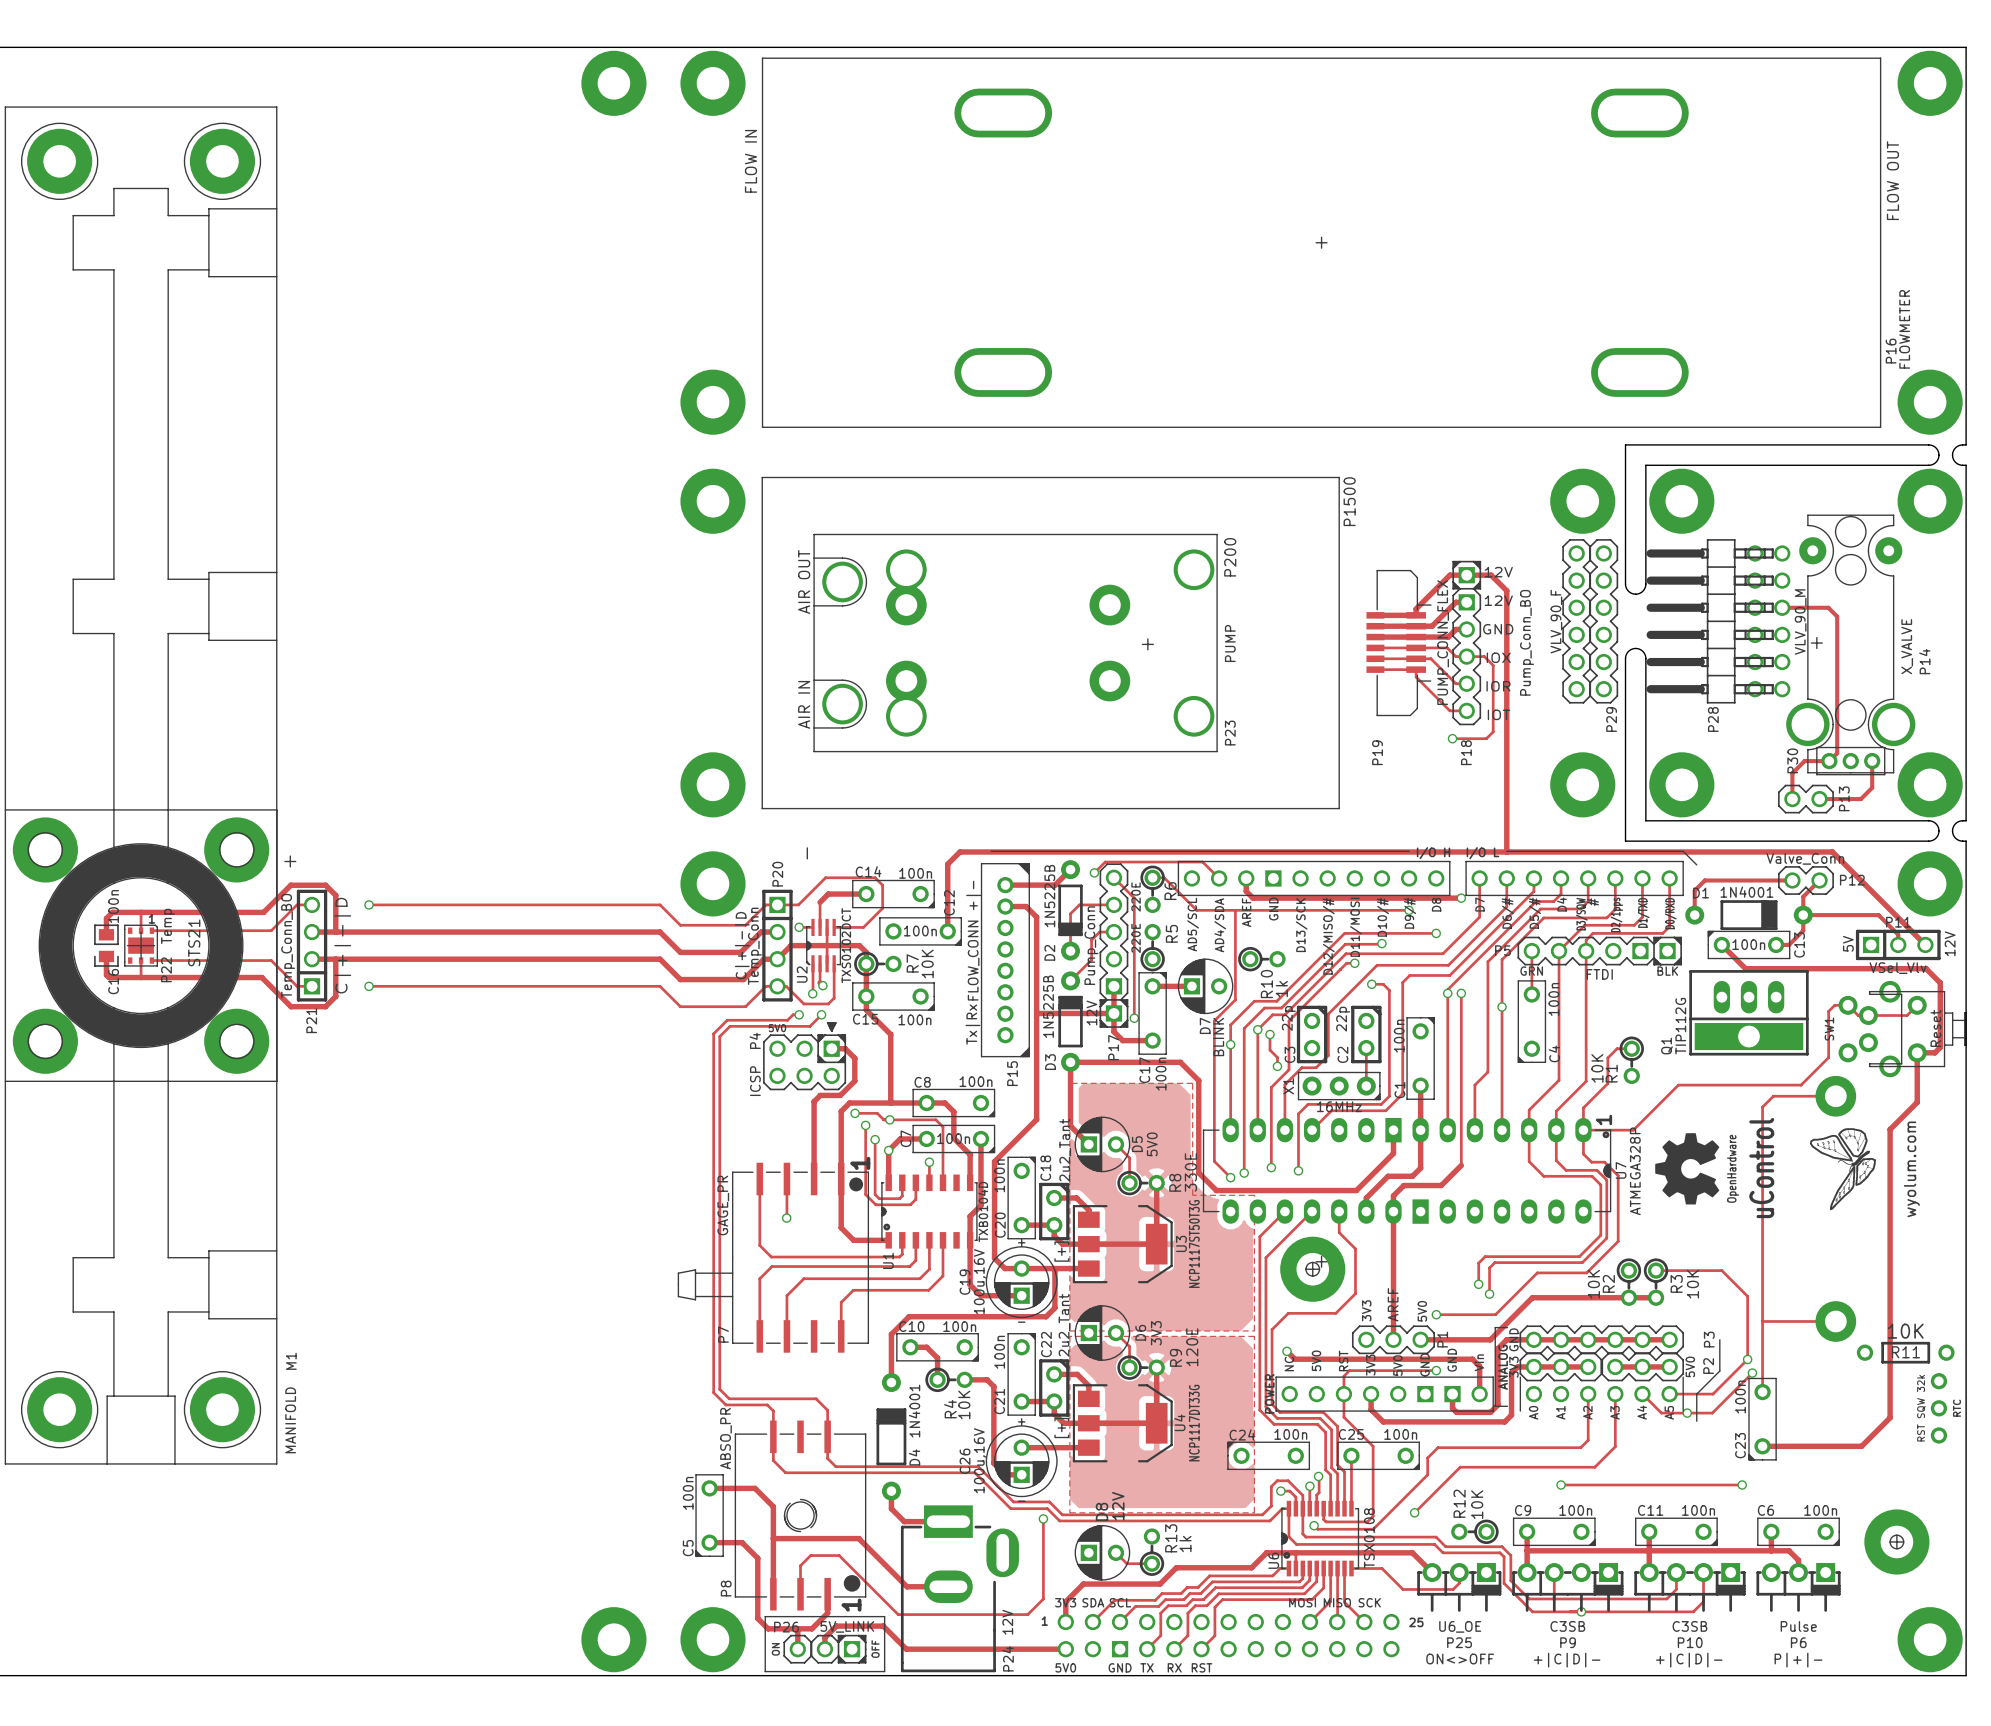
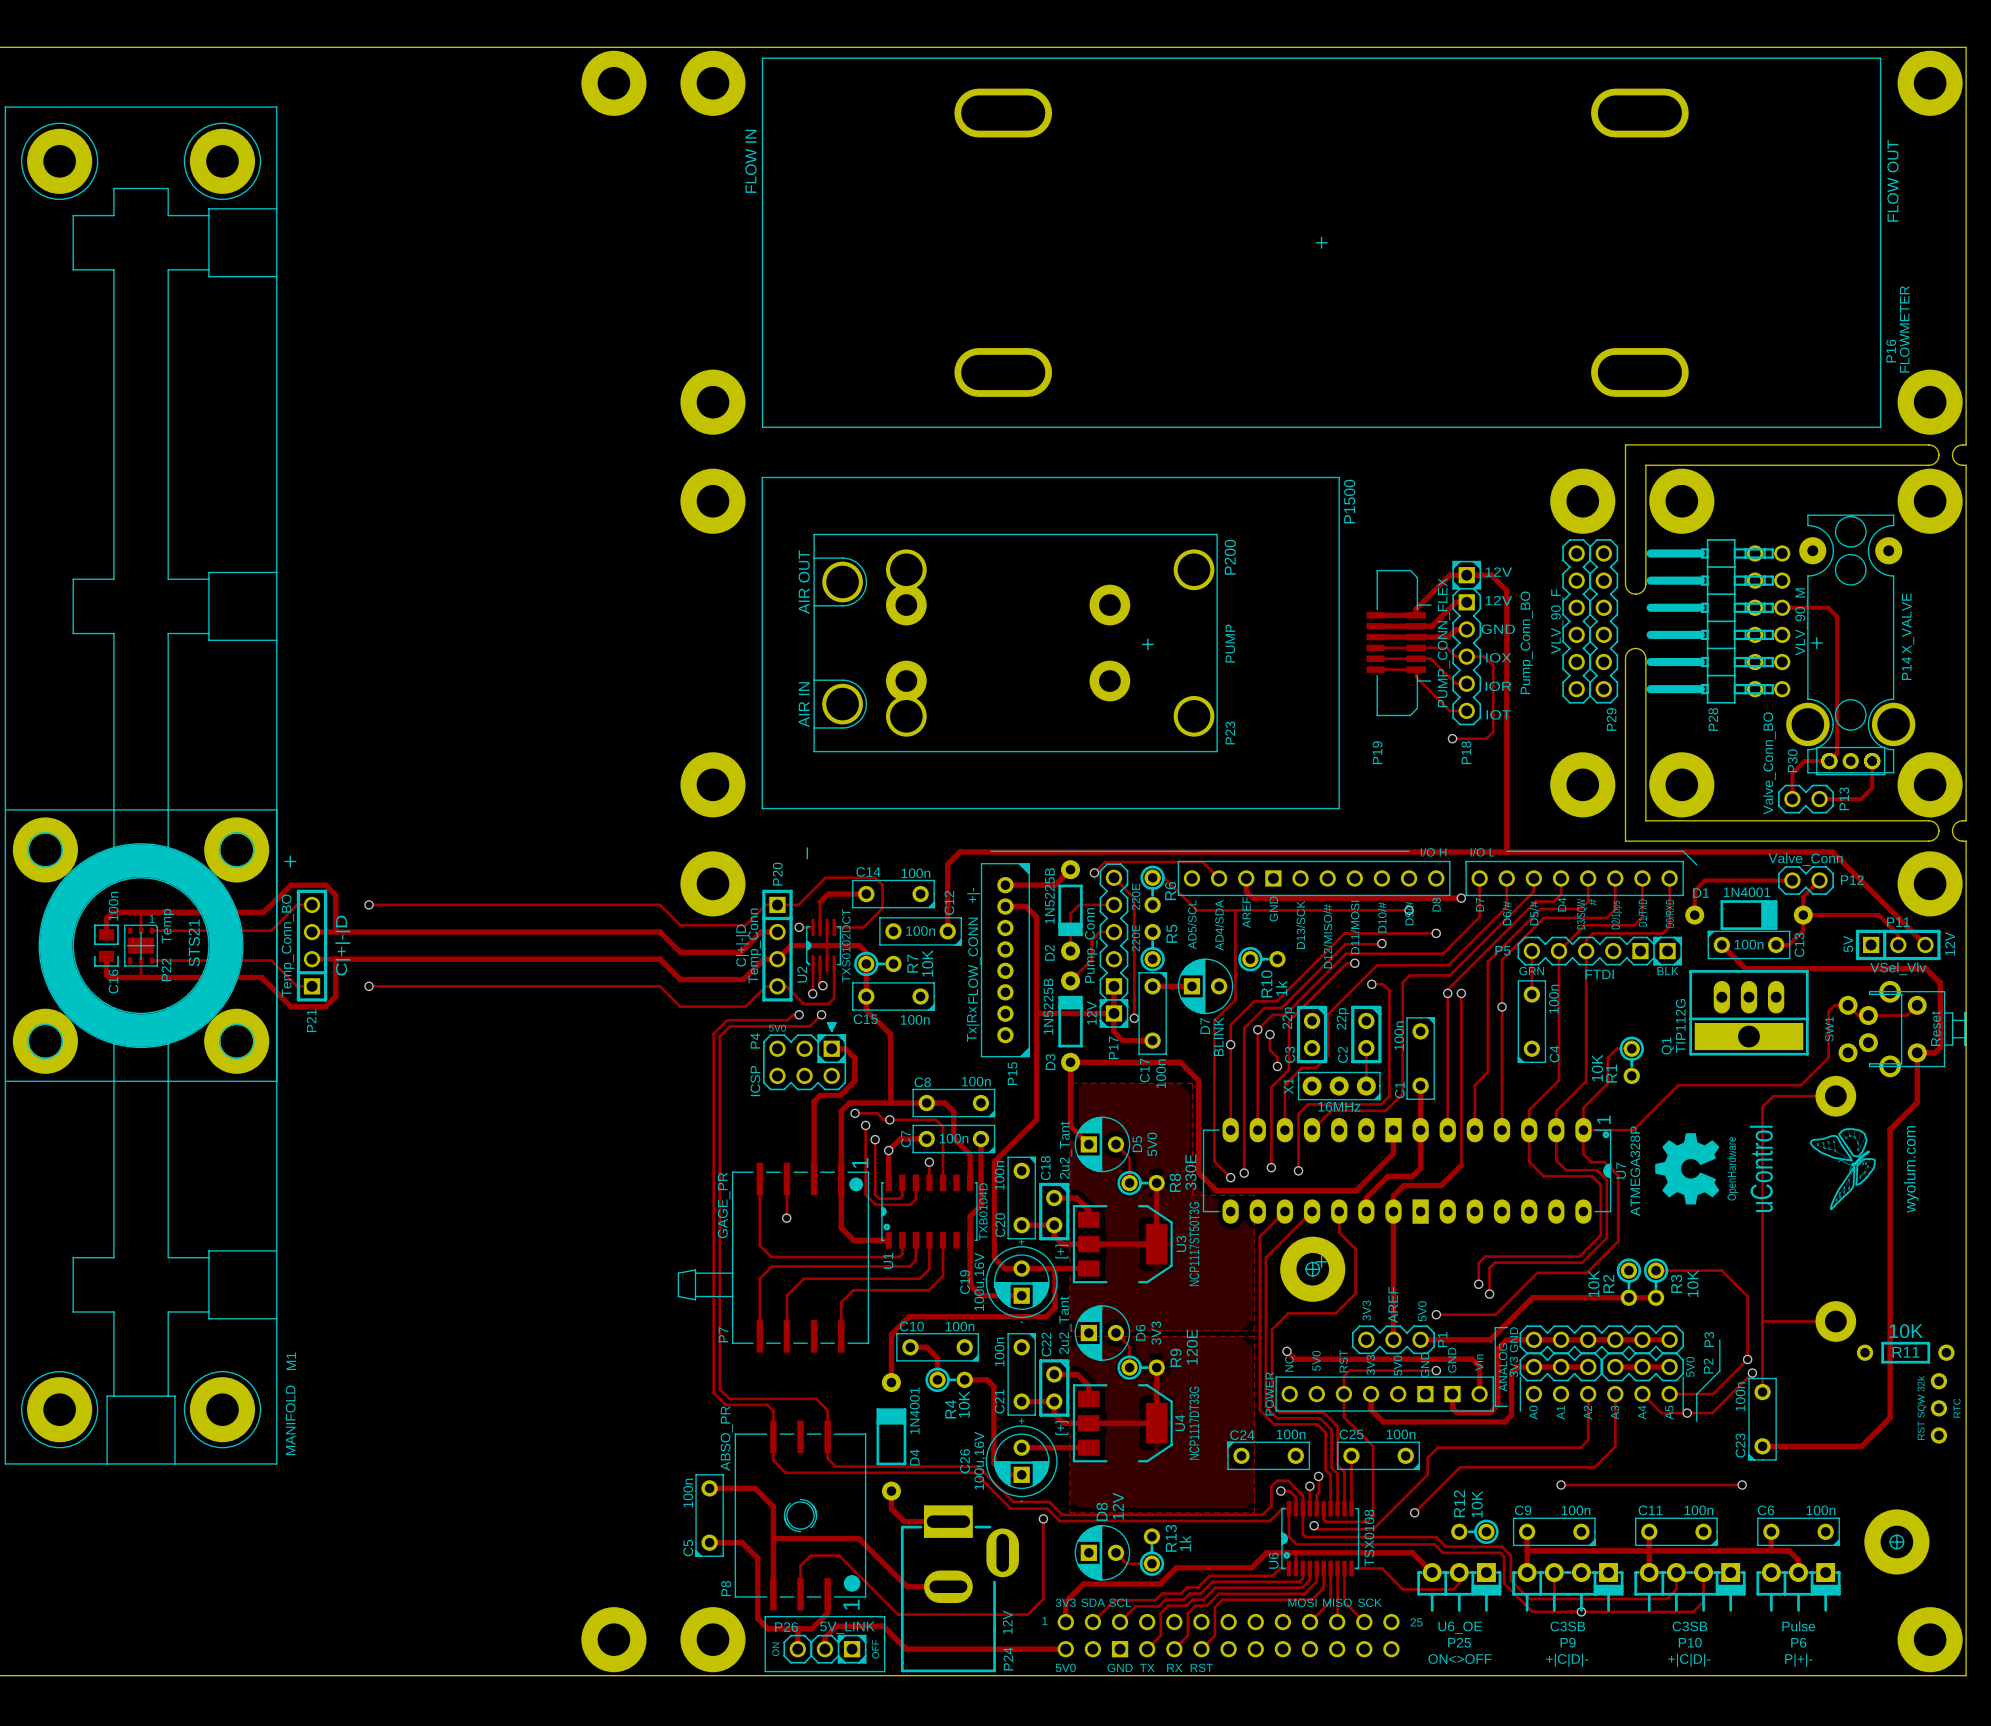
P14 footprint: [1786, 514, 1916, 774] -> [1786, 514, 1916, 774]
P14 value position: X_VALVE (1907, 646) -> X_VALVE (1908, 623)
P13 value: none -> Valve_Conn_BO (1769, 763)

